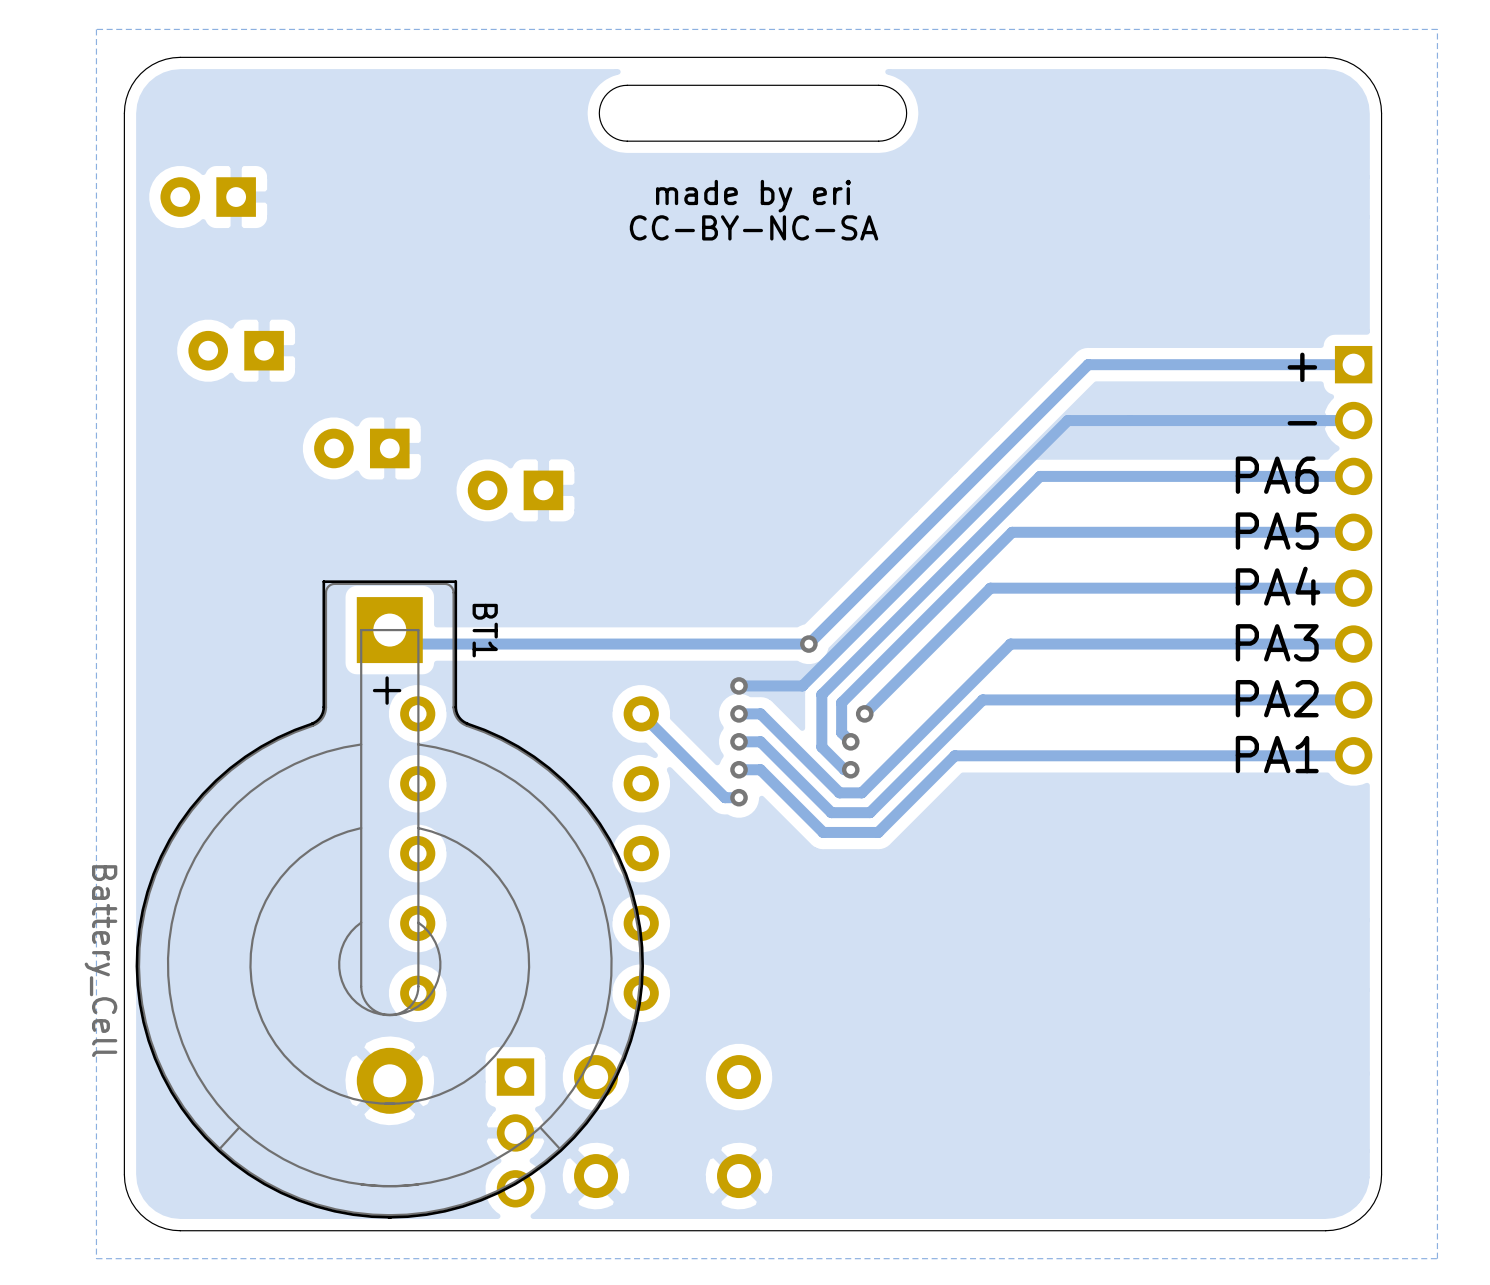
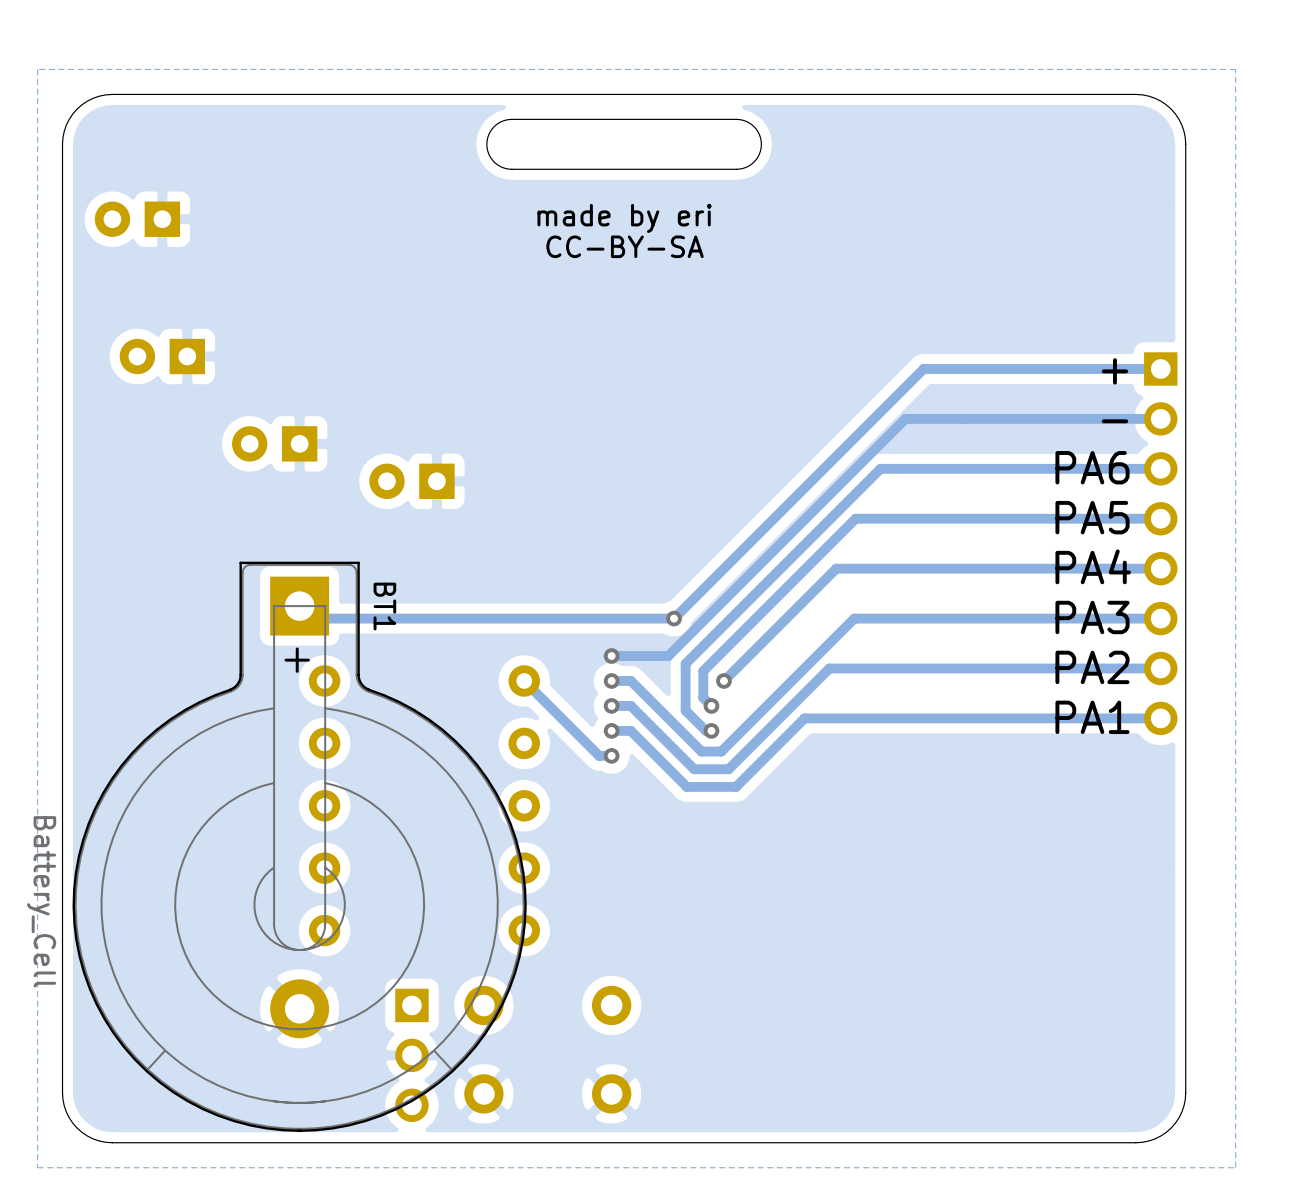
text: CC-BY-NC-SA (754, 227) -> CC-BY-SA (625, 246)

